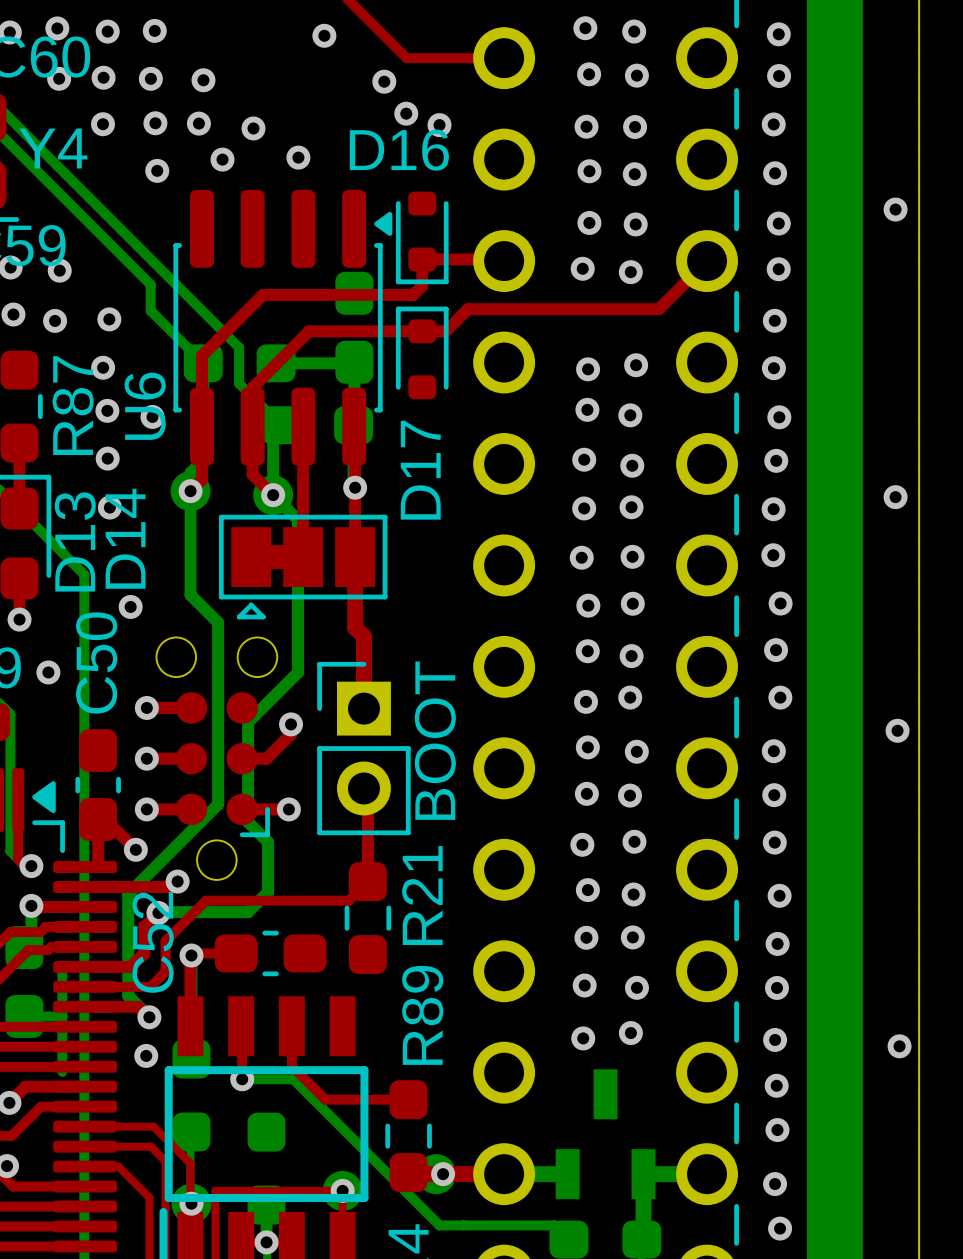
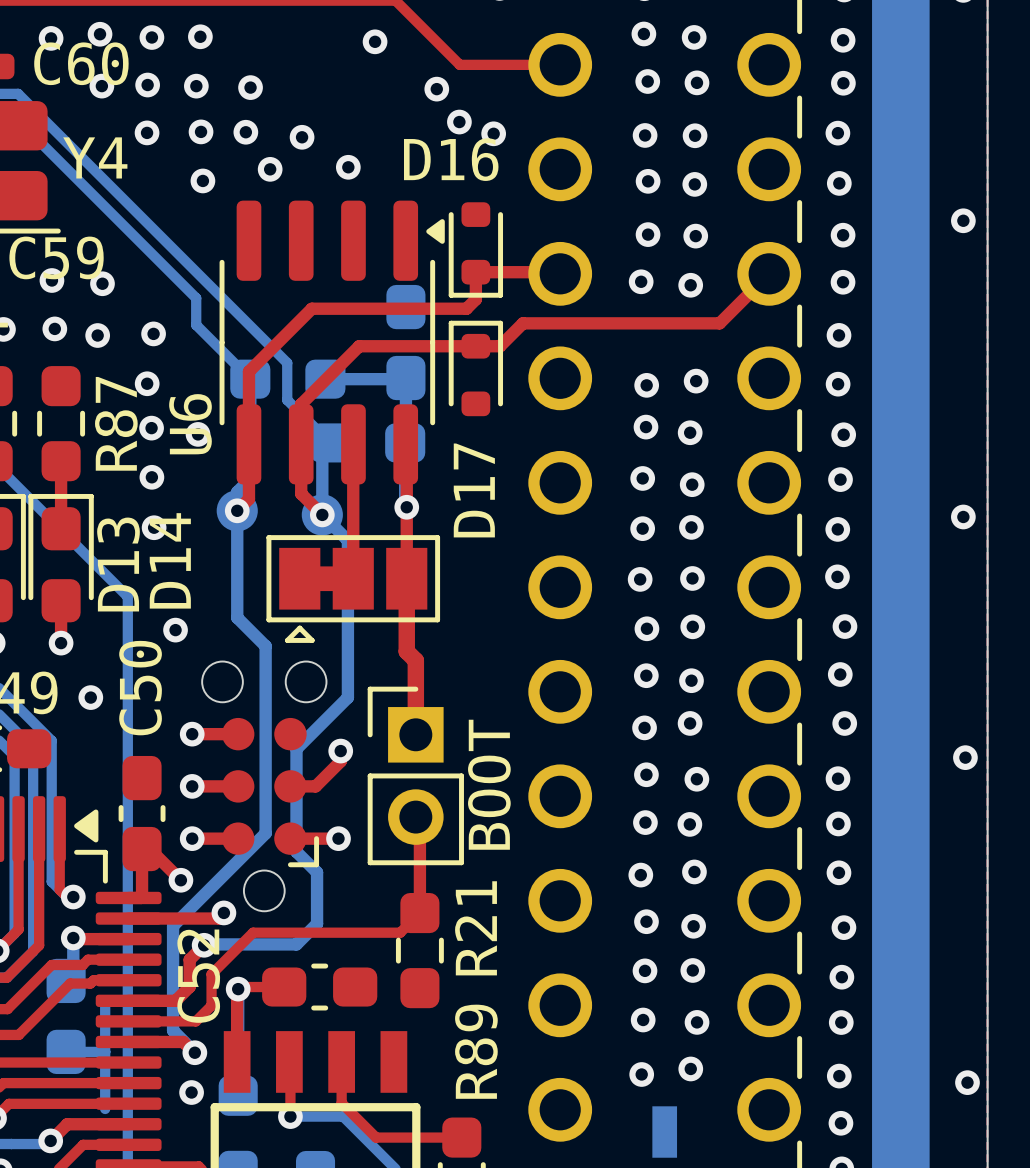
U6 footprint: [173, 189, 393, 466] -> [219, 200, 445, 485]

